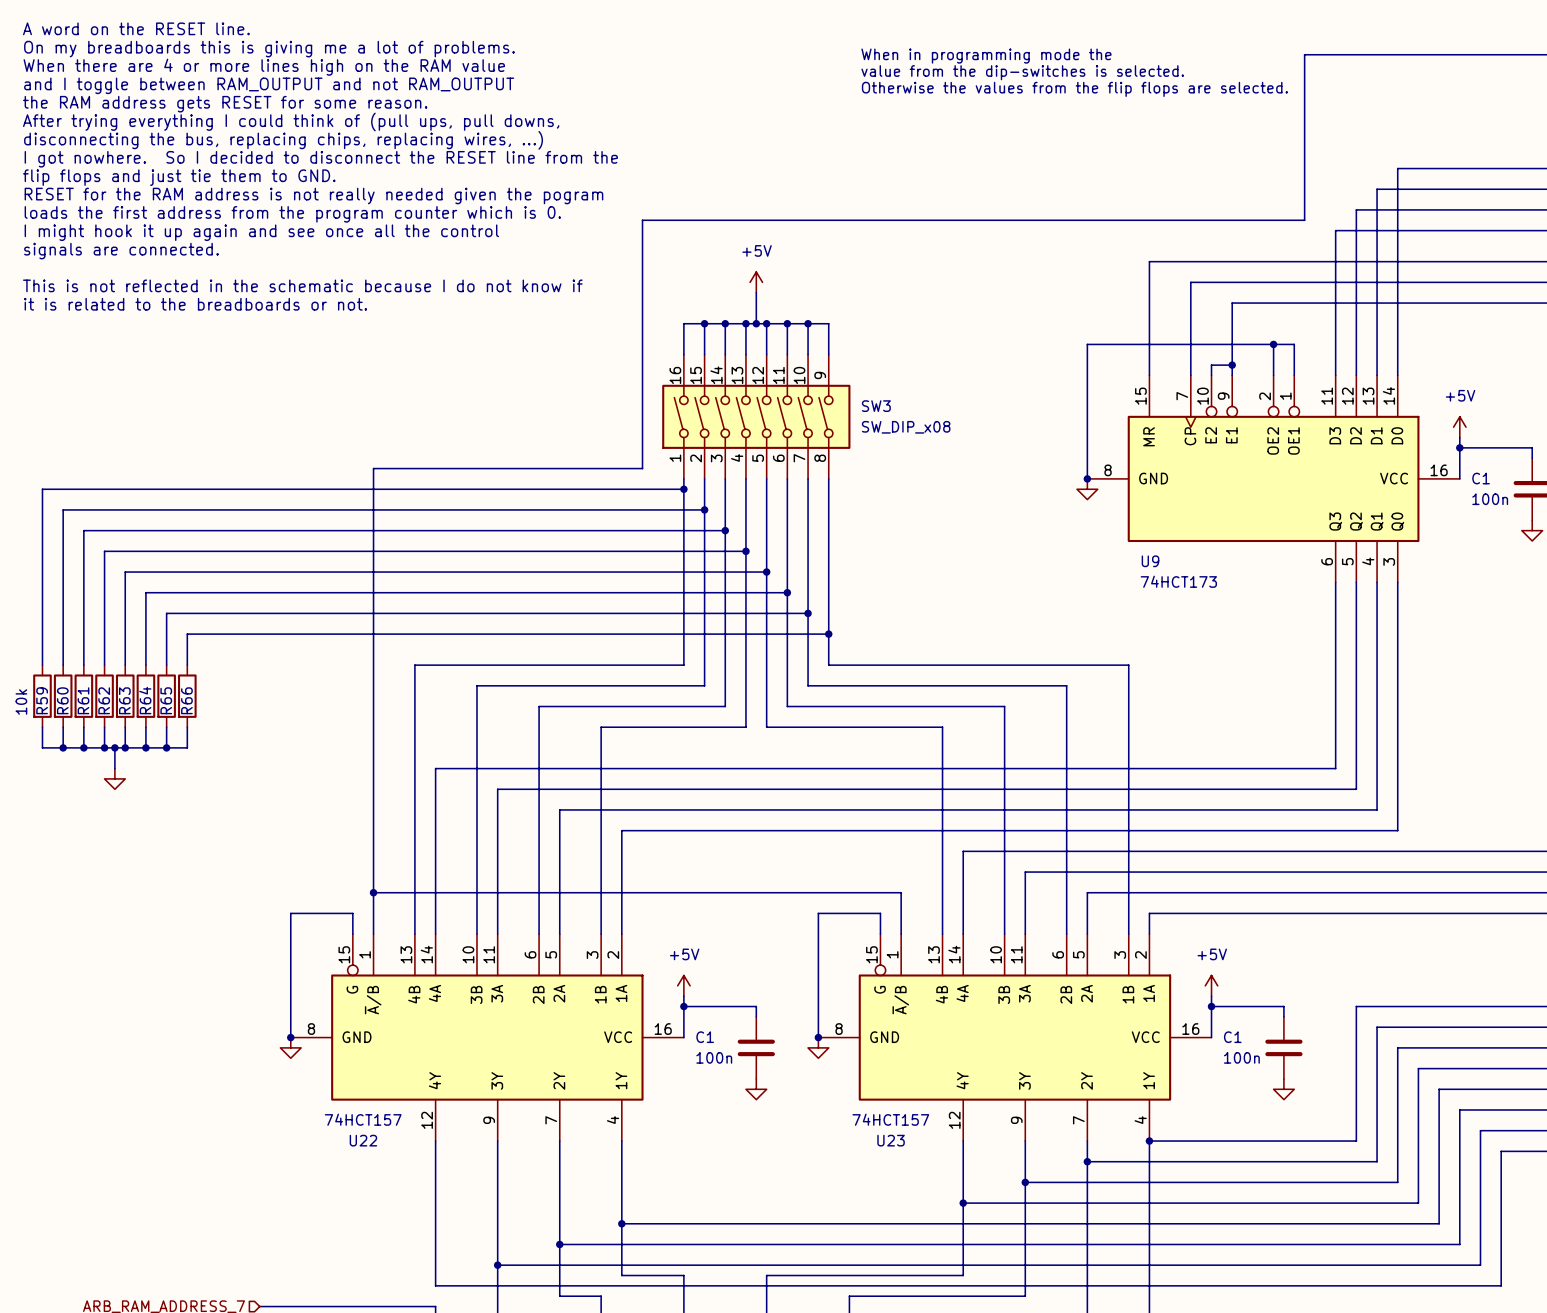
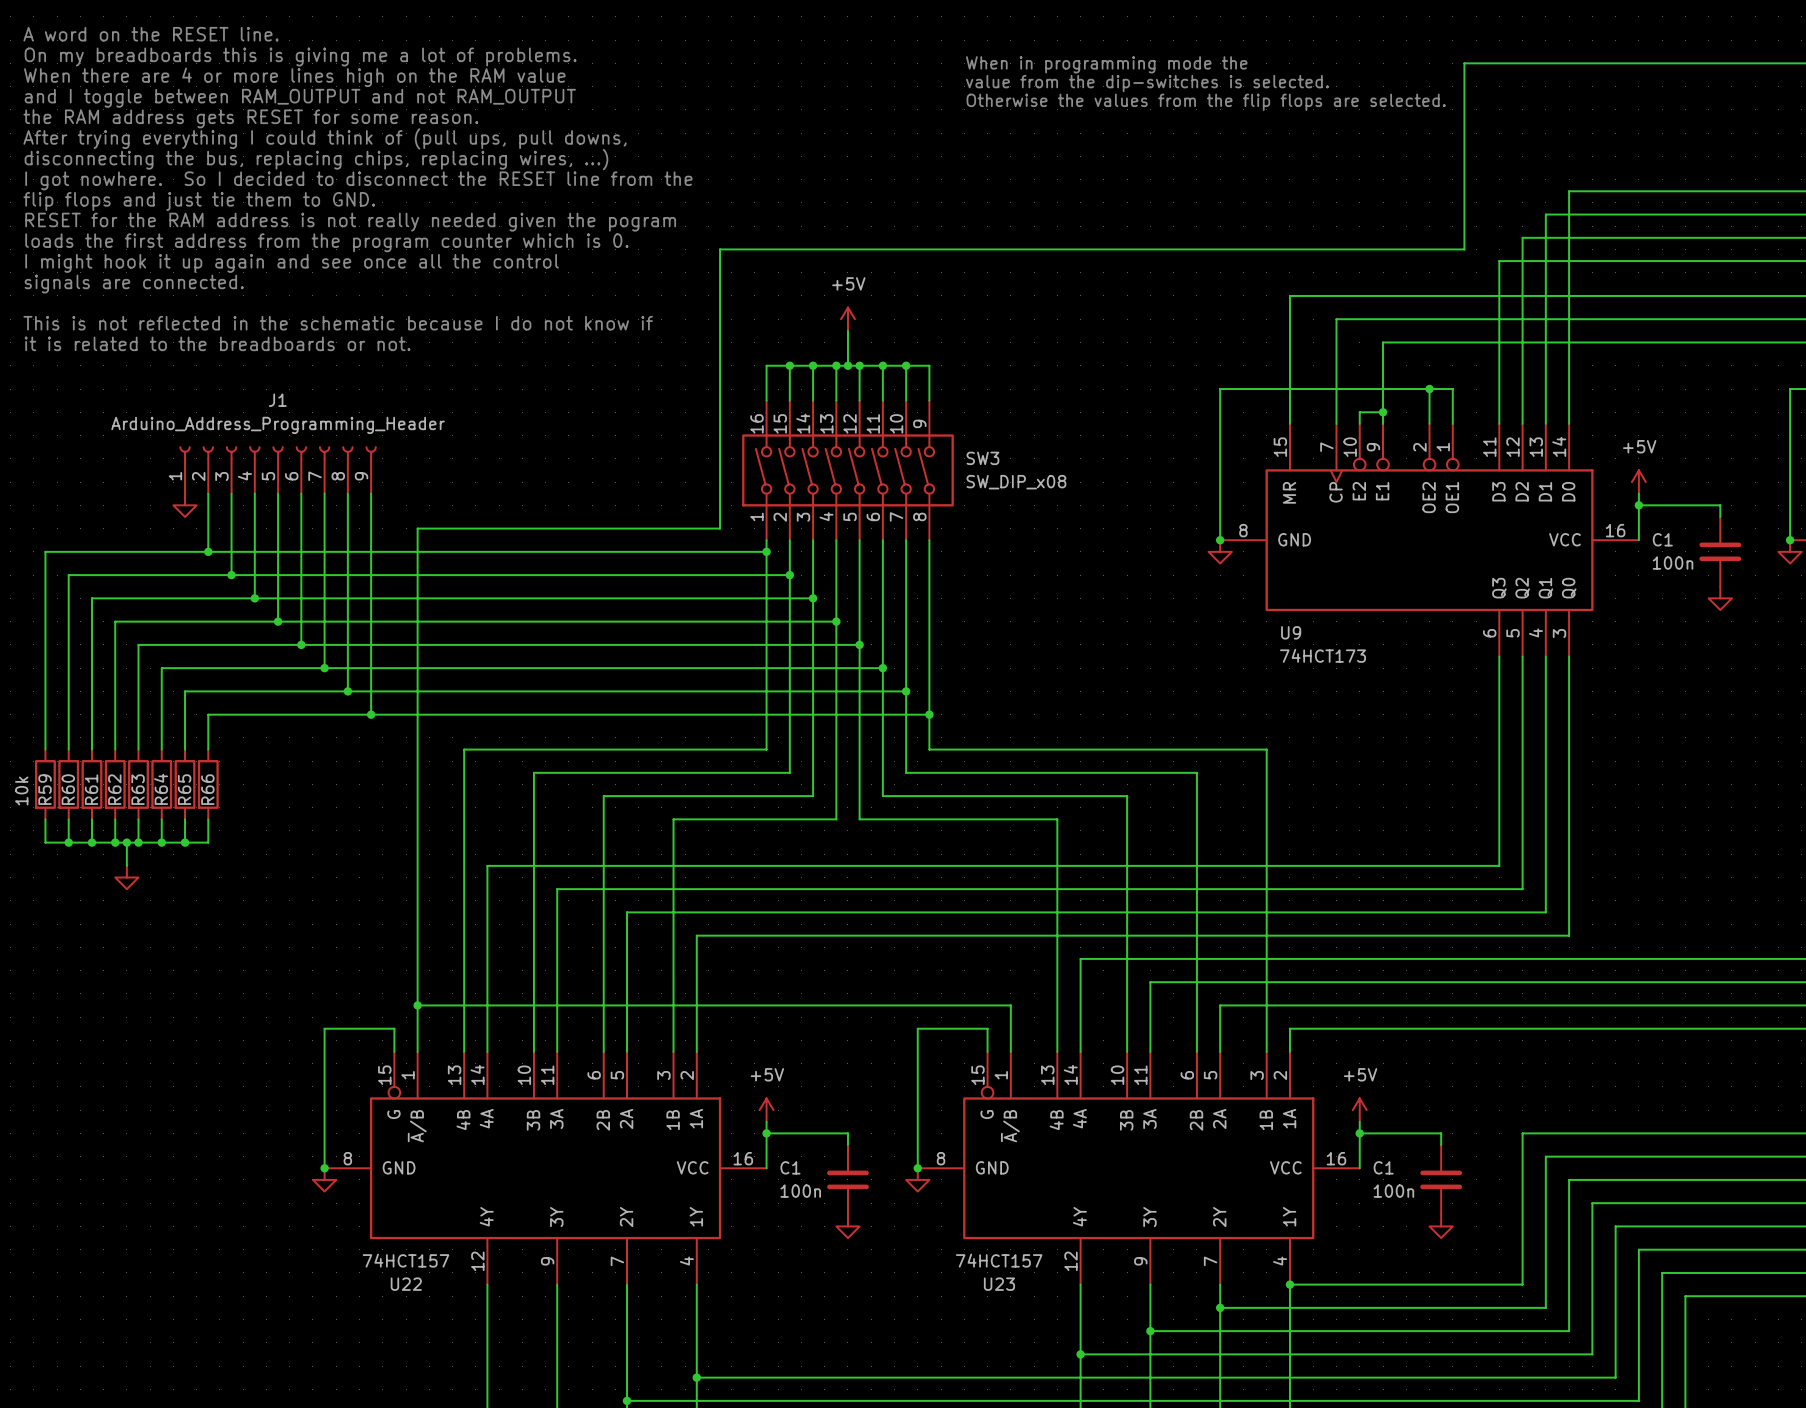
J1: none -> Arduino_Address_Programming_Header (278, 470)
wire: none -> (208, 493) (208, 551)
wire: none -> (231, 493) (231, 575)
wire: none -> (254, 493) (254, 598)
wire: none -> (278, 493) (278, 621)
wire: none -> (301, 493) (301, 644)
wire: none -> (324, 493) (324, 668)
wire: none -> (347, 493) (347, 691)
wire: none -> (371, 493) (371, 714)
power symbol: none -> (185, 505)
junction: none -> (208, 551)
junction: none -> (231, 575)
junction: none -> (254, 598)
junction: none -> (278, 621)
junction: none -> (301, 644)
junction: none -> (324, 668)
junction: none -> (347, 691)
junction: none -> (371, 714)

